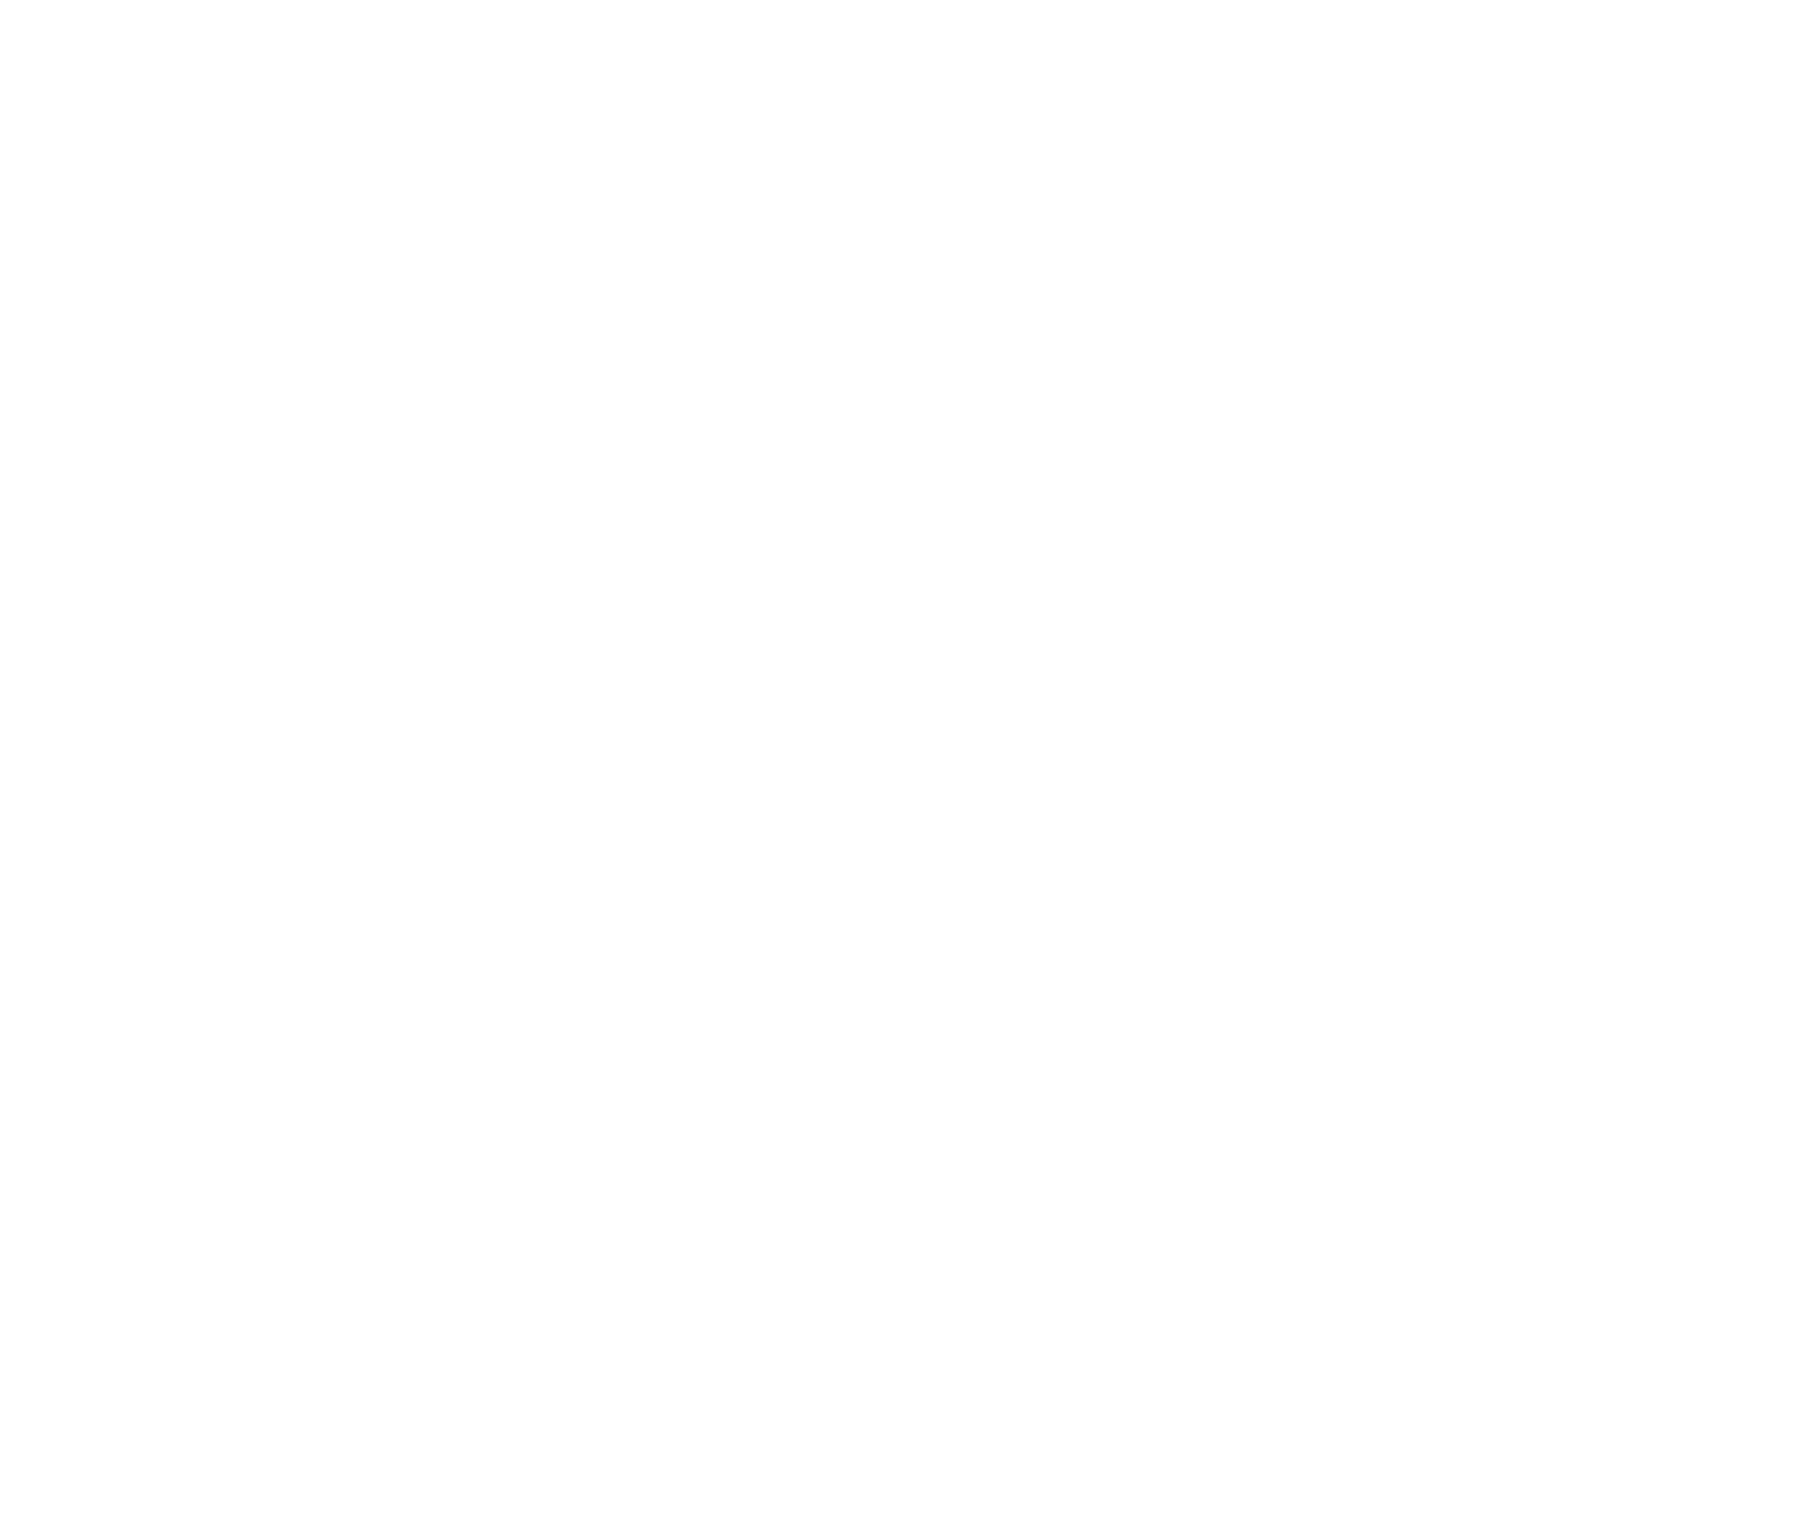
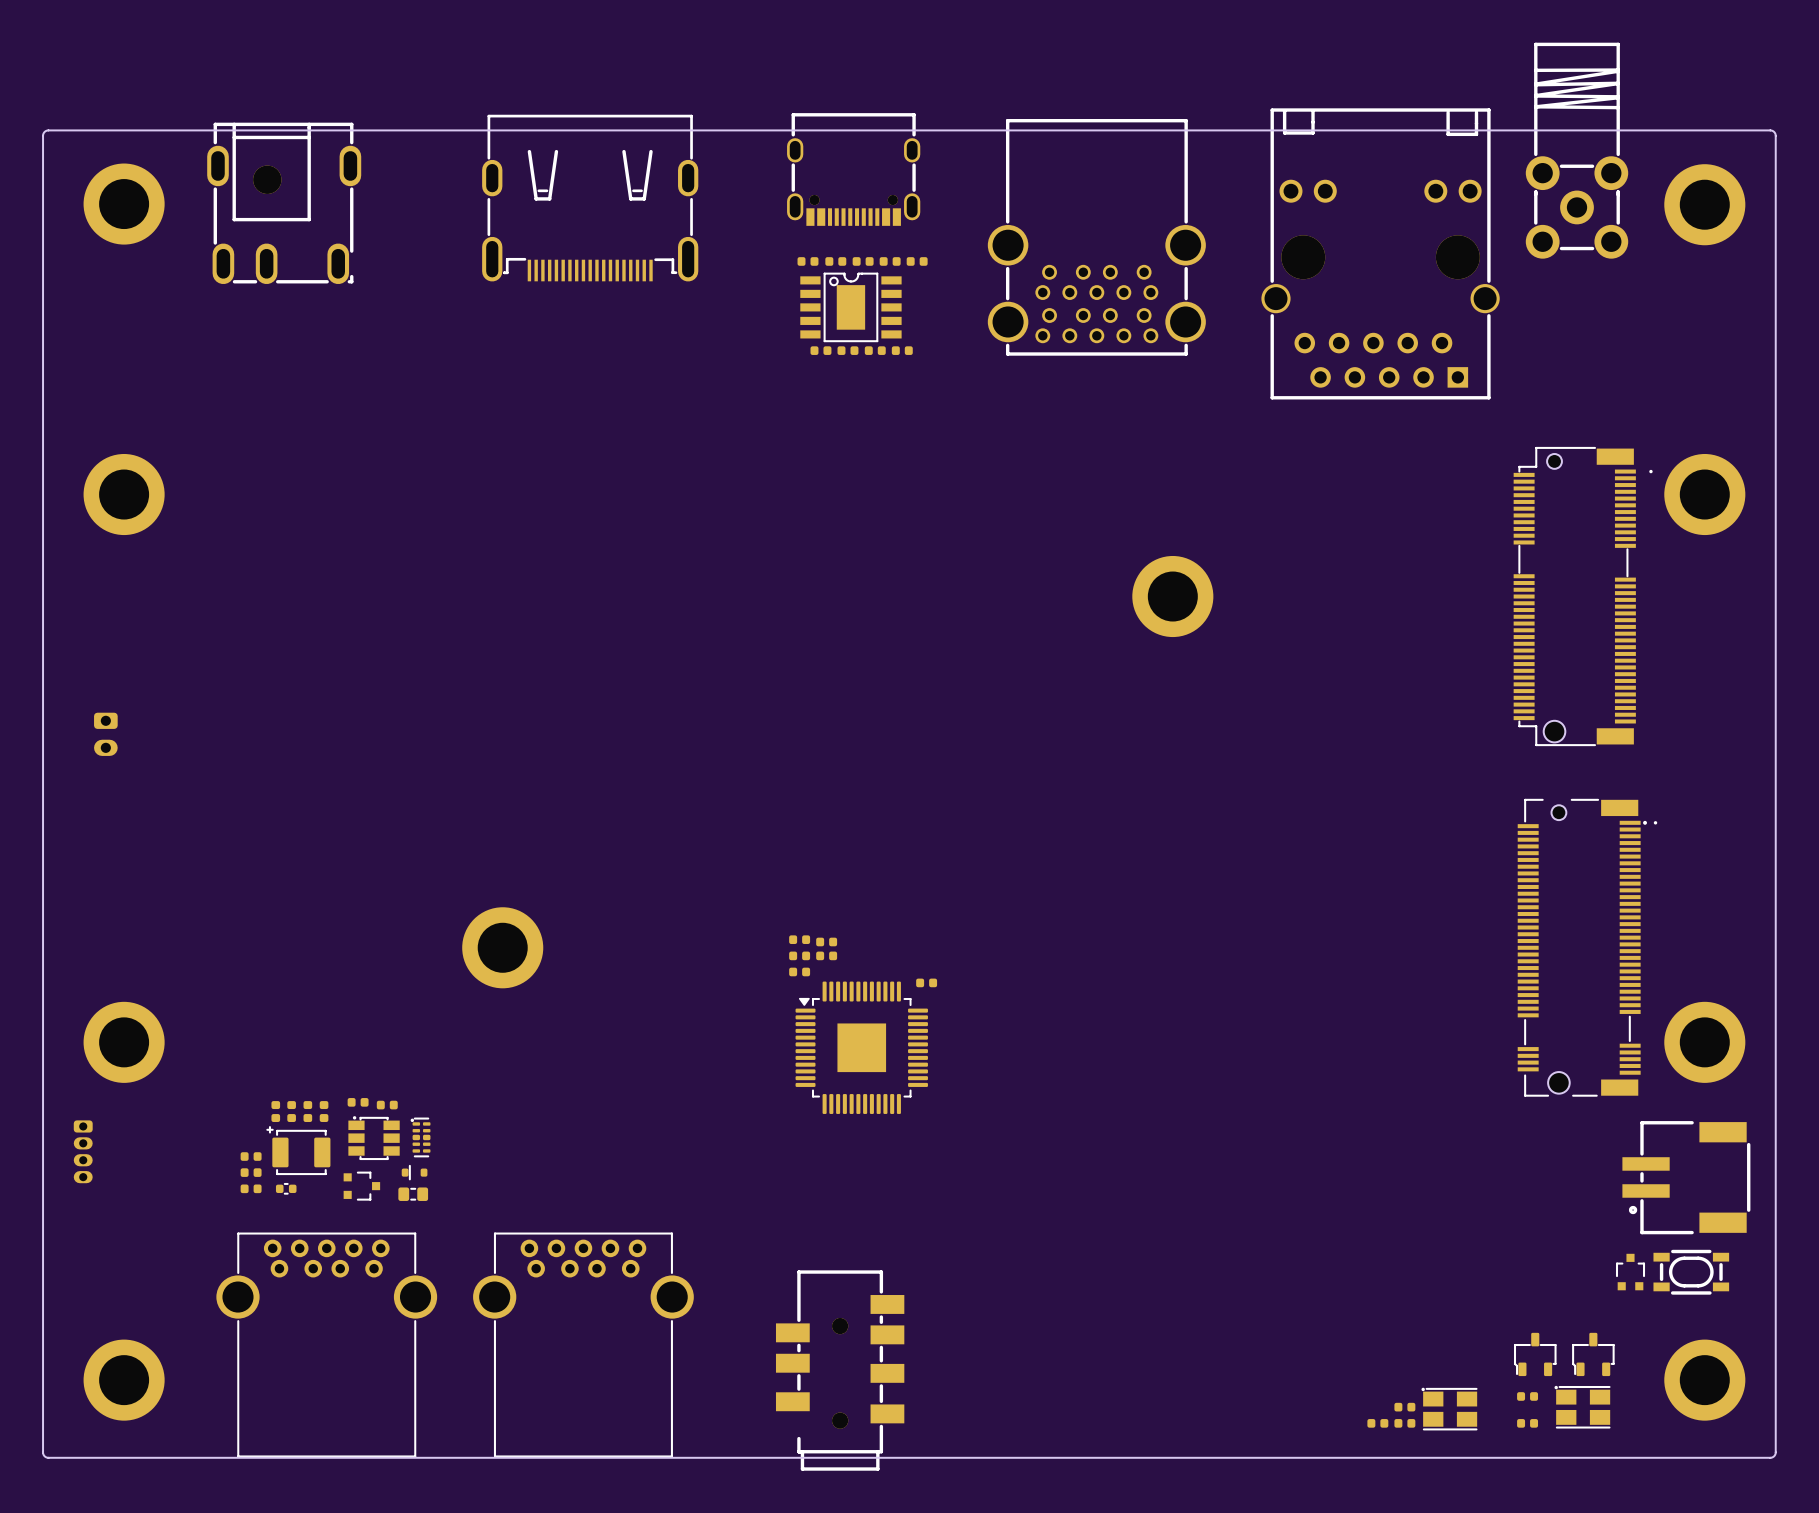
board edge: none -> (1770, 130) (45, 131) (43, 135) (44, 1455) (48, 1457) (1773, 1456) (1775, 1452) (1775, 135) (1774, 132) (1770, 130)
part: none -> (1577, 150)
part: none -> (853, 169)
part: none -> (590, 198)
part: none -> (284, 203)
part: none -> (124, 204)
part: none -> (1704, 204)
part: none -> (1096, 237)
part: none -> (1380, 253)
part: none -> (807, 261)
part: none -> (835, 261)
part: none -> (863, 261)
part: none -> (890, 261)
part: none -> (917, 261)
part: none -> (850, 307)
part: none -> (820, 350)
part: none -> (847, 350)
part: none -> (875, 350)
part: none -> (902, 350)
part: none -> (124, 494)
part: none -> (1704, 494)
part: none -> (1172, 596)
part: none -> (1583, 596)
part: none -> (105, 734)
part: none -> (799, 939)
part: none -> (826, 941)
part: none -> (502, 947)
part: none -> (1587, 947)
part: none -> (799, 955)
part: none -> (826, 955)
part: none -> (799, 971)
part: none -> (926, 982)
part: none -> (124, 1042)
part: none -> (1704, 1042)
part: none -> (861, 1047)
part: none -> (358, 1102)
part: none -> (387, 1105)
part: none -> (275, 1111)
part: none -> (291, 1111)
part: none -> (307, 1111)
part: none -> (324, 1111)
part: none -> (420, 1137)
part: none -> (374, 1138)
part: none -> (298, 1150)
part: none -> (83, 1151)
part: none -> (251, 1156)
part: none -> (251, 1172)
part: none -> (414, 1172)
part: none -> (1686, 1177)
part: none -> (361, 1186)
part: none -> (251, 1188)
part: none -> (286, 1188)
part: none -> (413, 1194)
part: none -> (1630, 1272)
part: none -> (1691, 1272)
part: none -> (326, 1344)
part: none -> (583, 1344)
part: none -> (1535, 1354)
part: none -> (1593, 1354)
part: none -> (840, 1370)
part: none -> (124, 1380)
part: none -> (1704, 1380)
part: none -> (1527, 1396)
part: none -> (1404, 1407)
part: none -> (1582, 1407)
part: none -> (1449, 1409)
part: none -> (1377, 1423)
part: none -> (1404, 1423)
part: none -> (1527, 1423)

